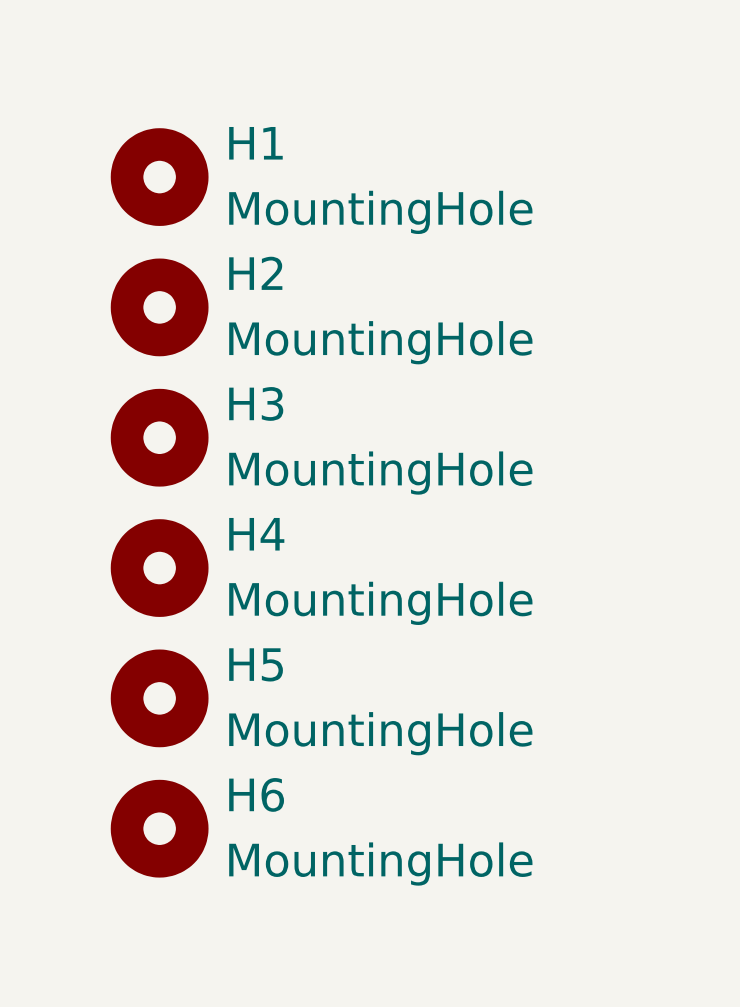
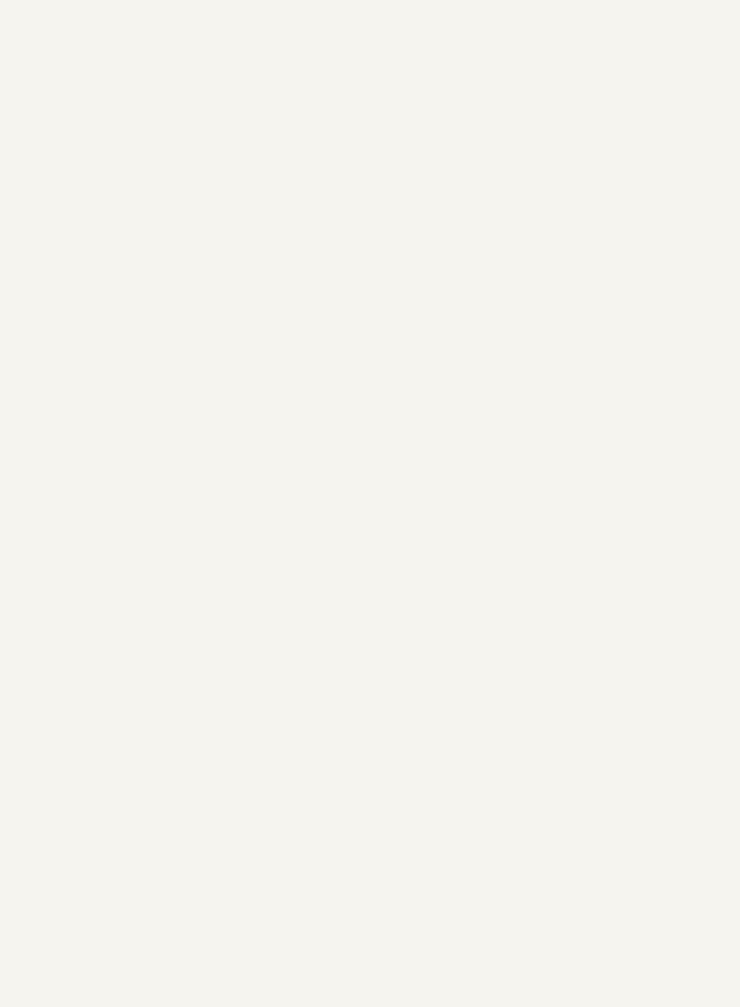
H1: MountingHole (159, 177) -> none
H2: MountingHole (159, 307) -> none
H3: MountingHole (159, 437) -> none
H4: MountingHole (159, 568) -> none
H5: MountingHole (159, 698) -> none
H6: MountingHole (159, 828) -> none

